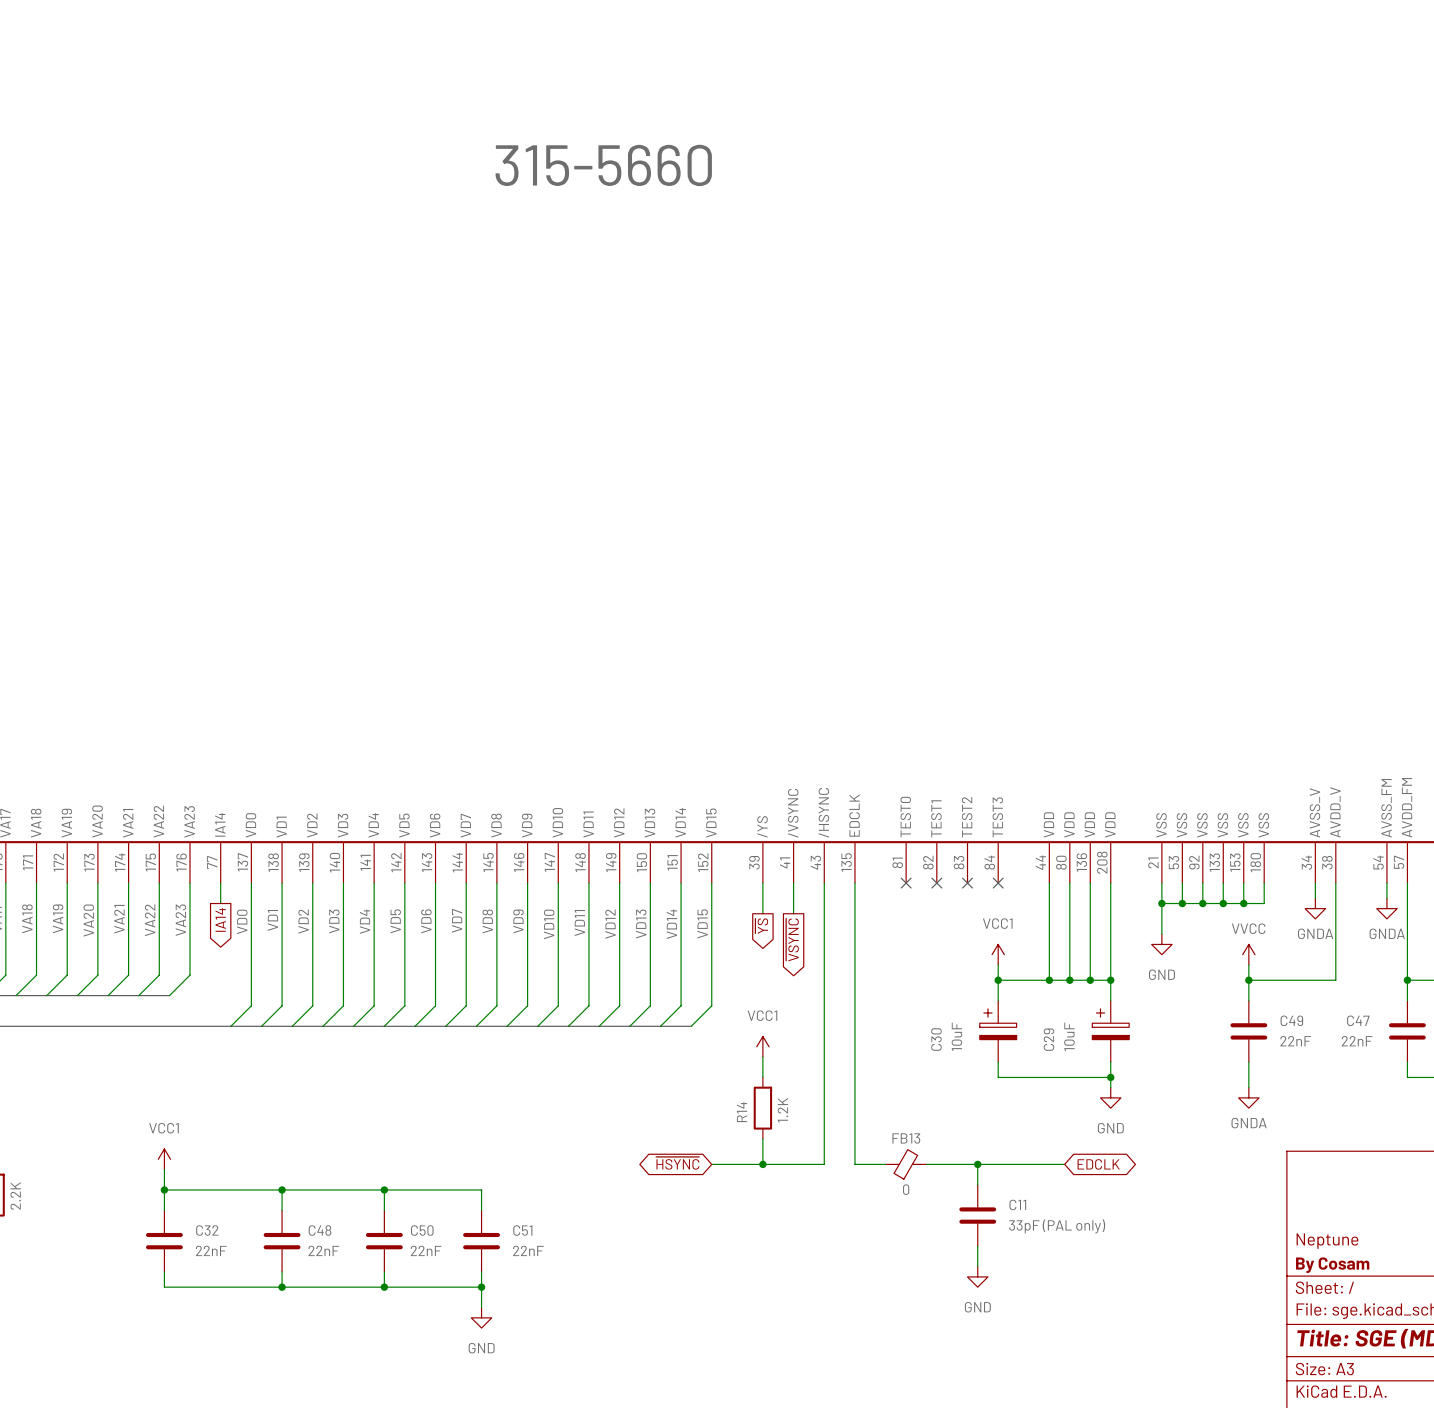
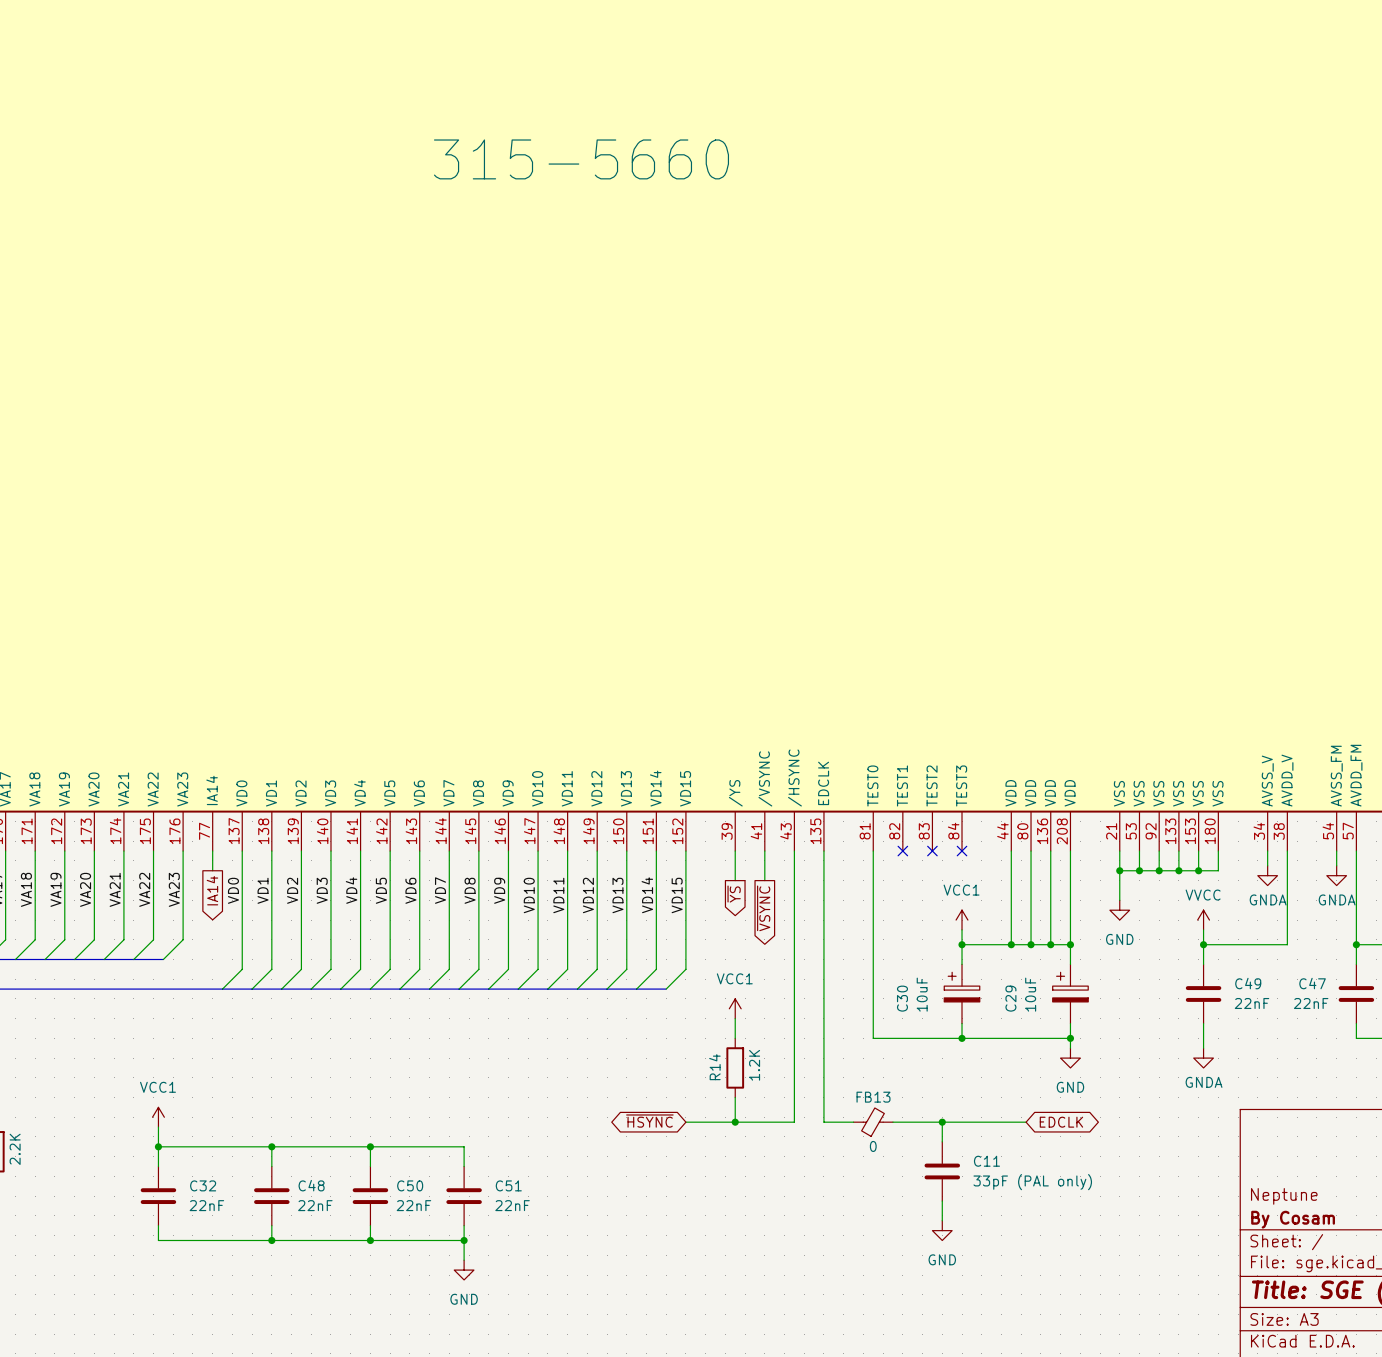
wire: none -> (873, 851) (873, 1038) (962, 1038)
no-connect mark: (906, 883) -> none
junction: none -> (962, 1038)

